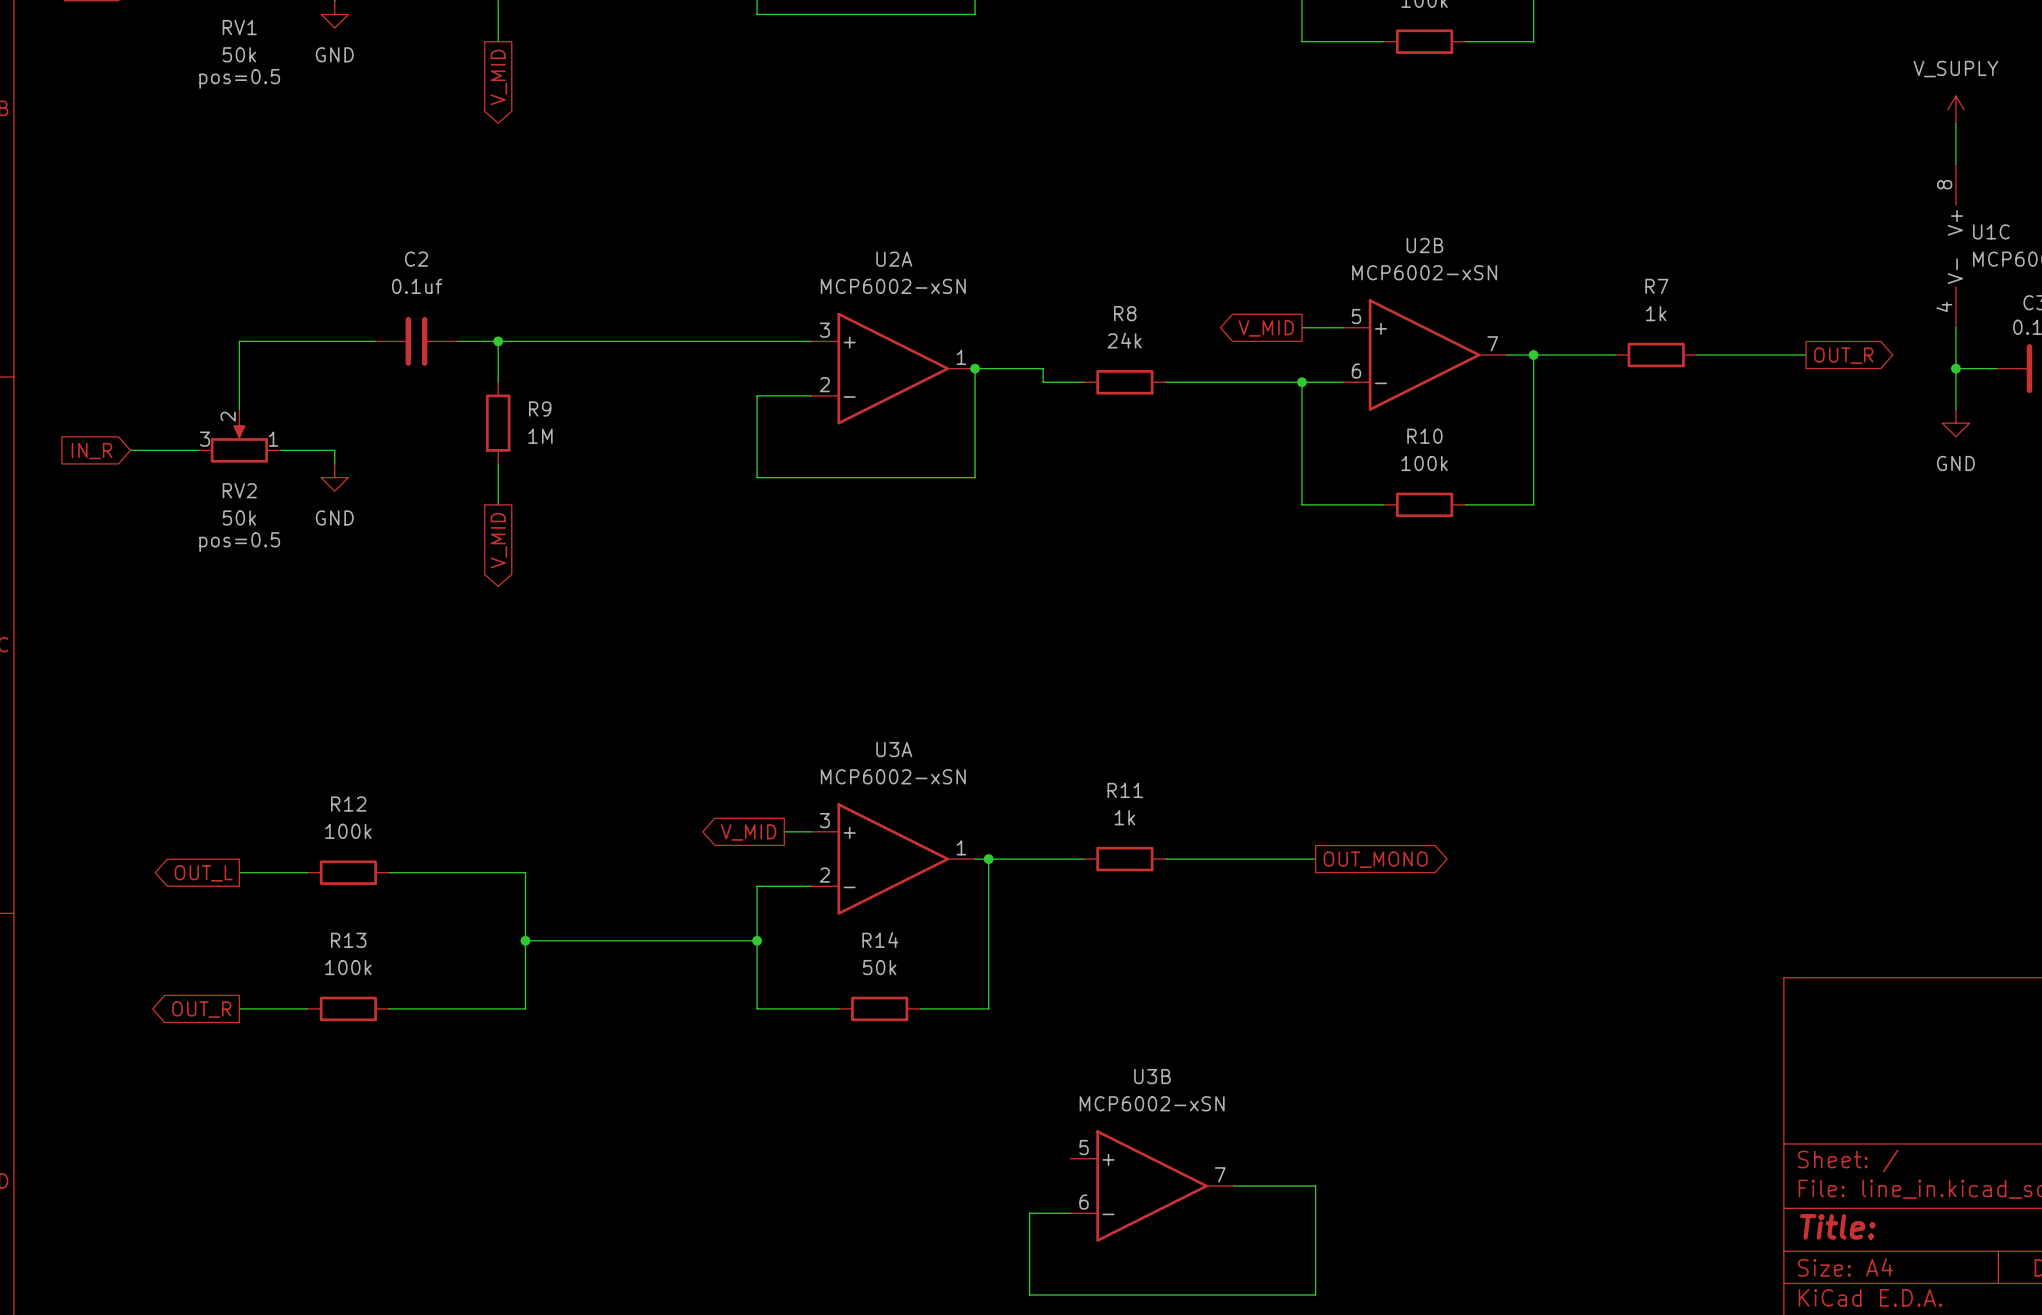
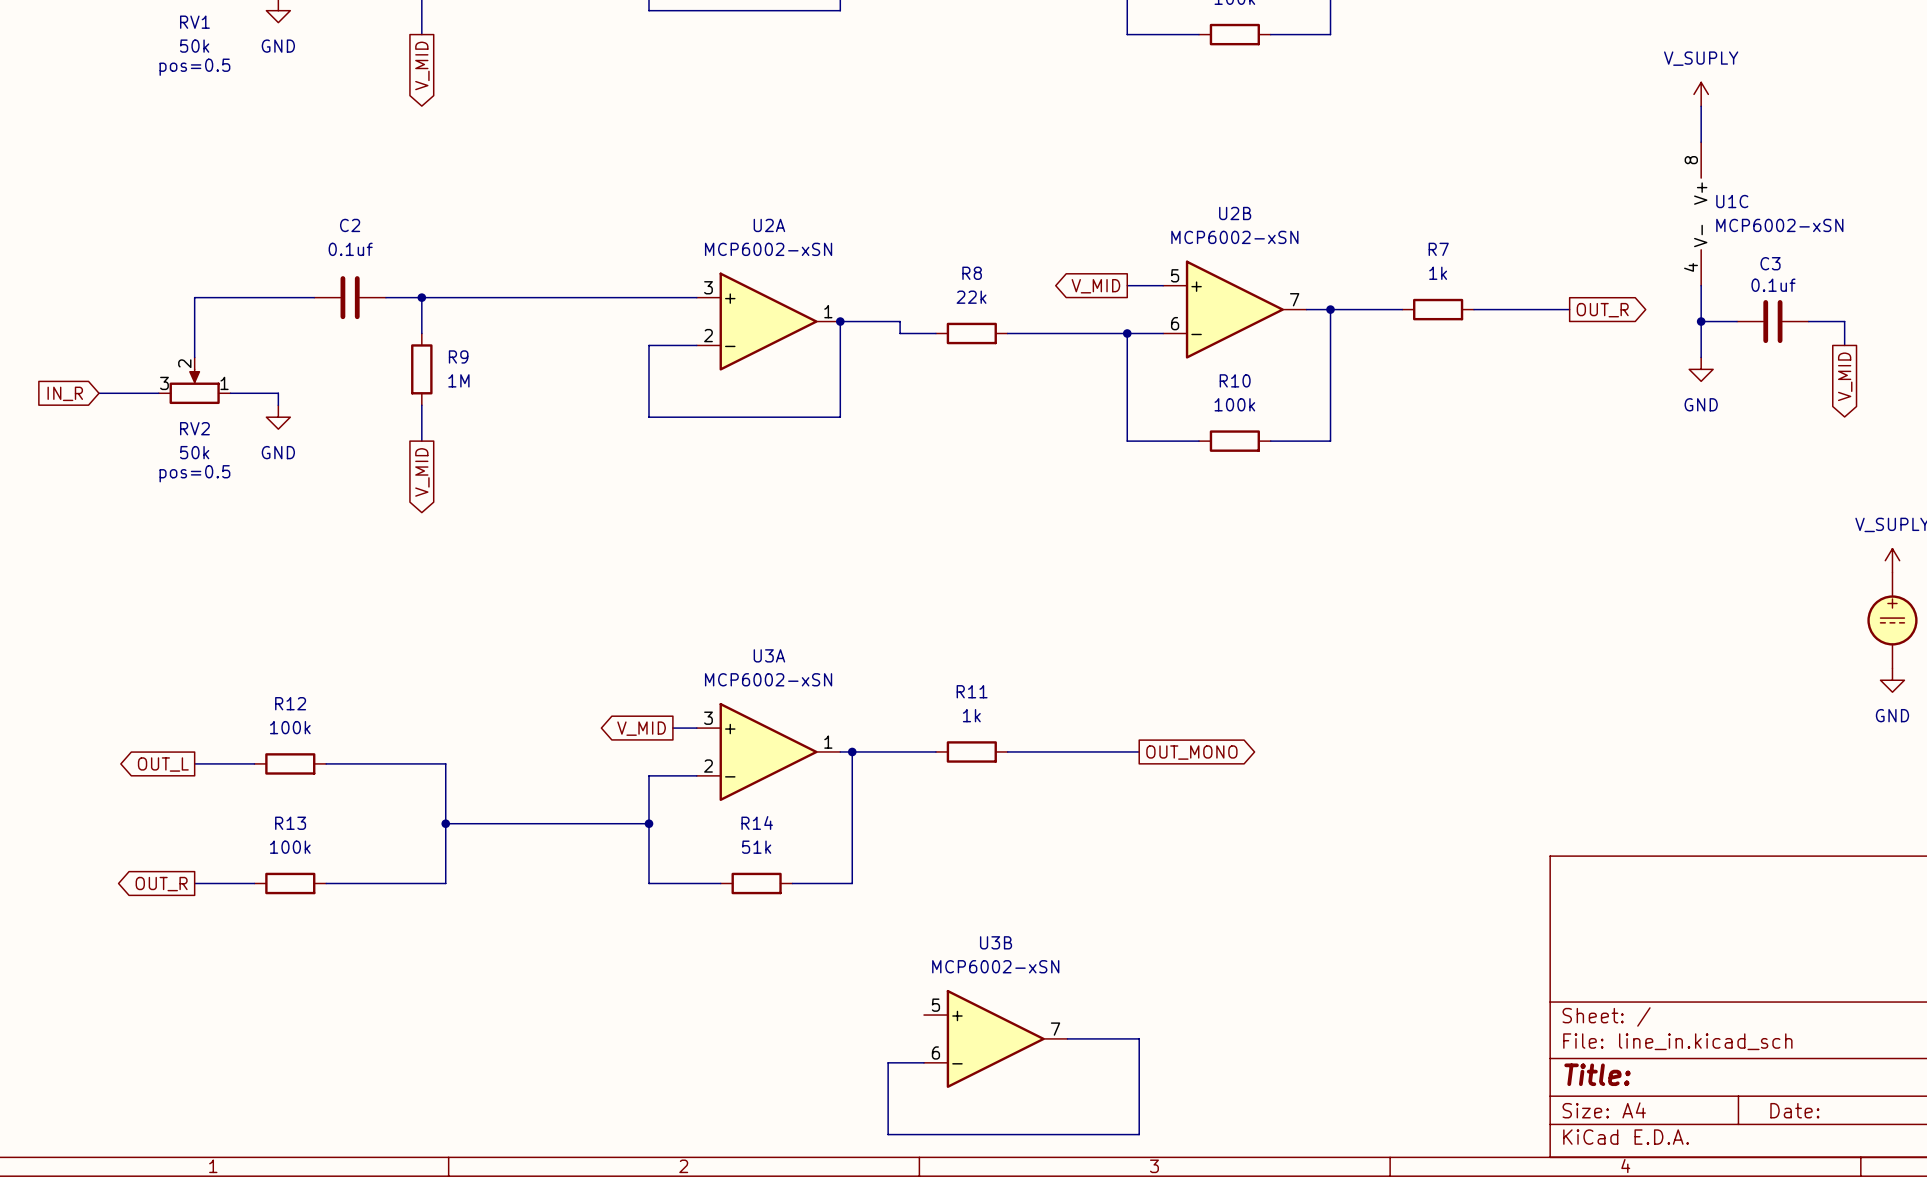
R8 value: 24k (1124, 340) -> 22k (971, 297)
R14 value: 50k (879, 967) -> 51k (756, 847)

